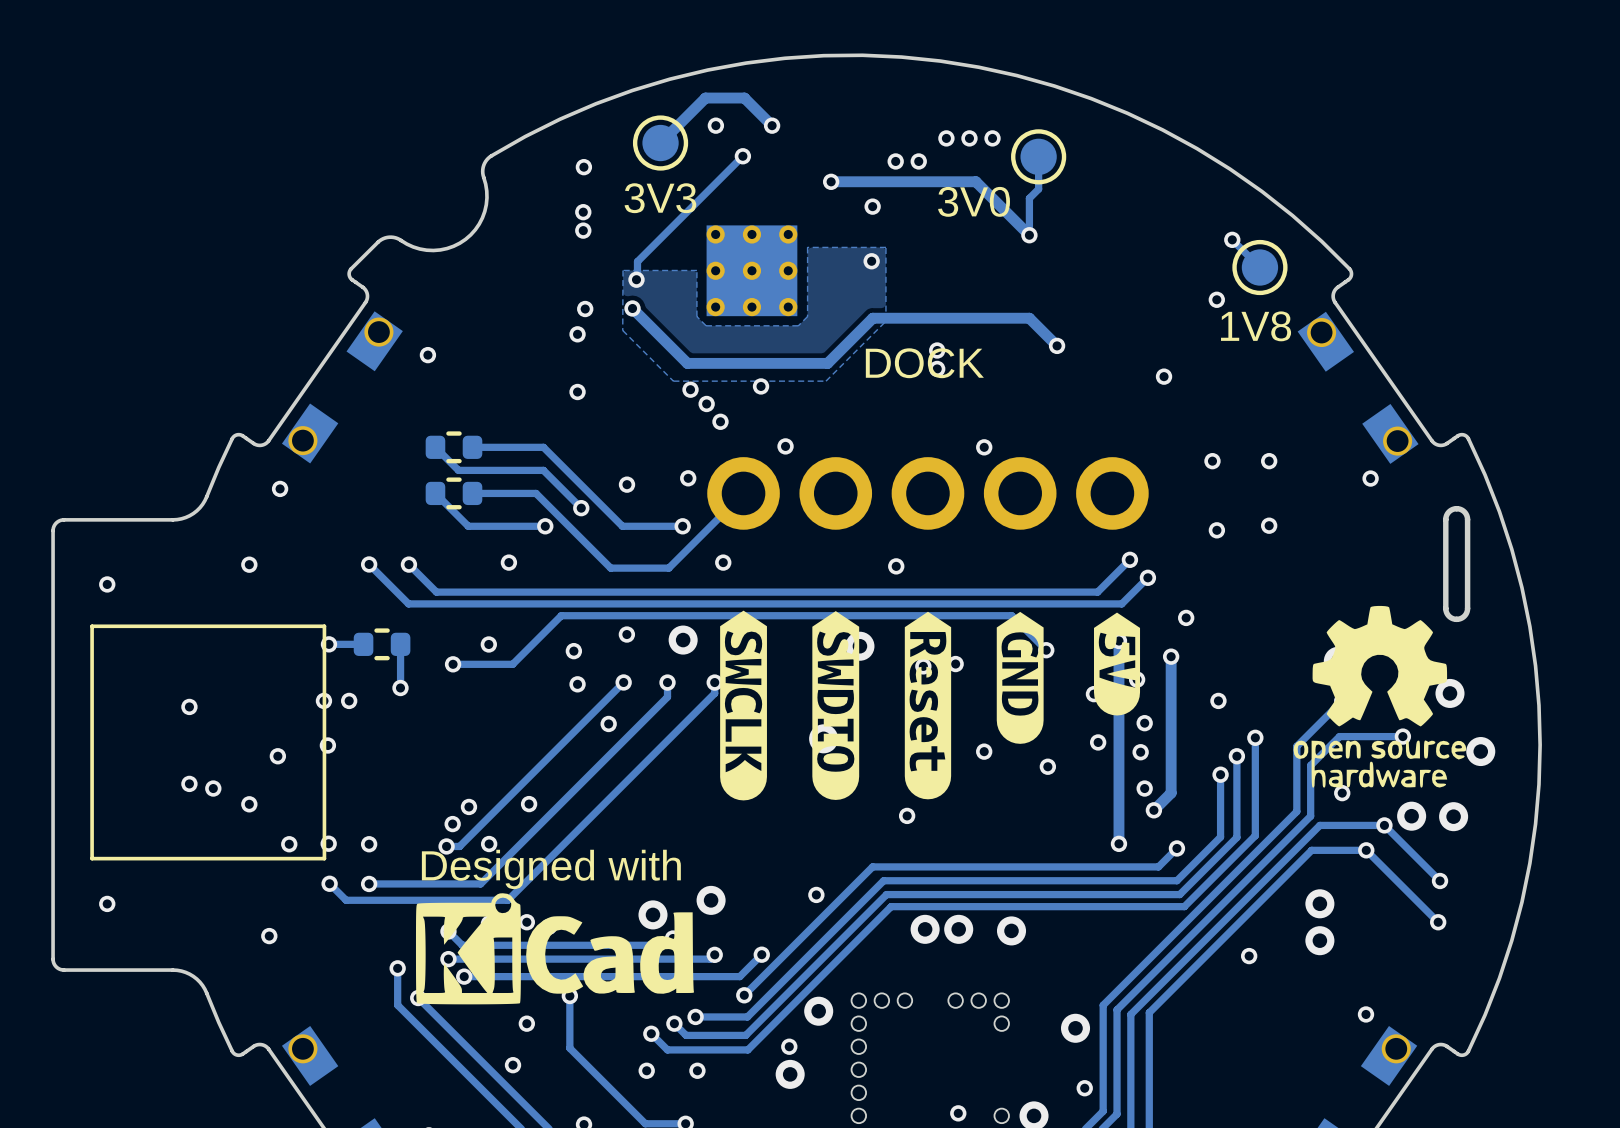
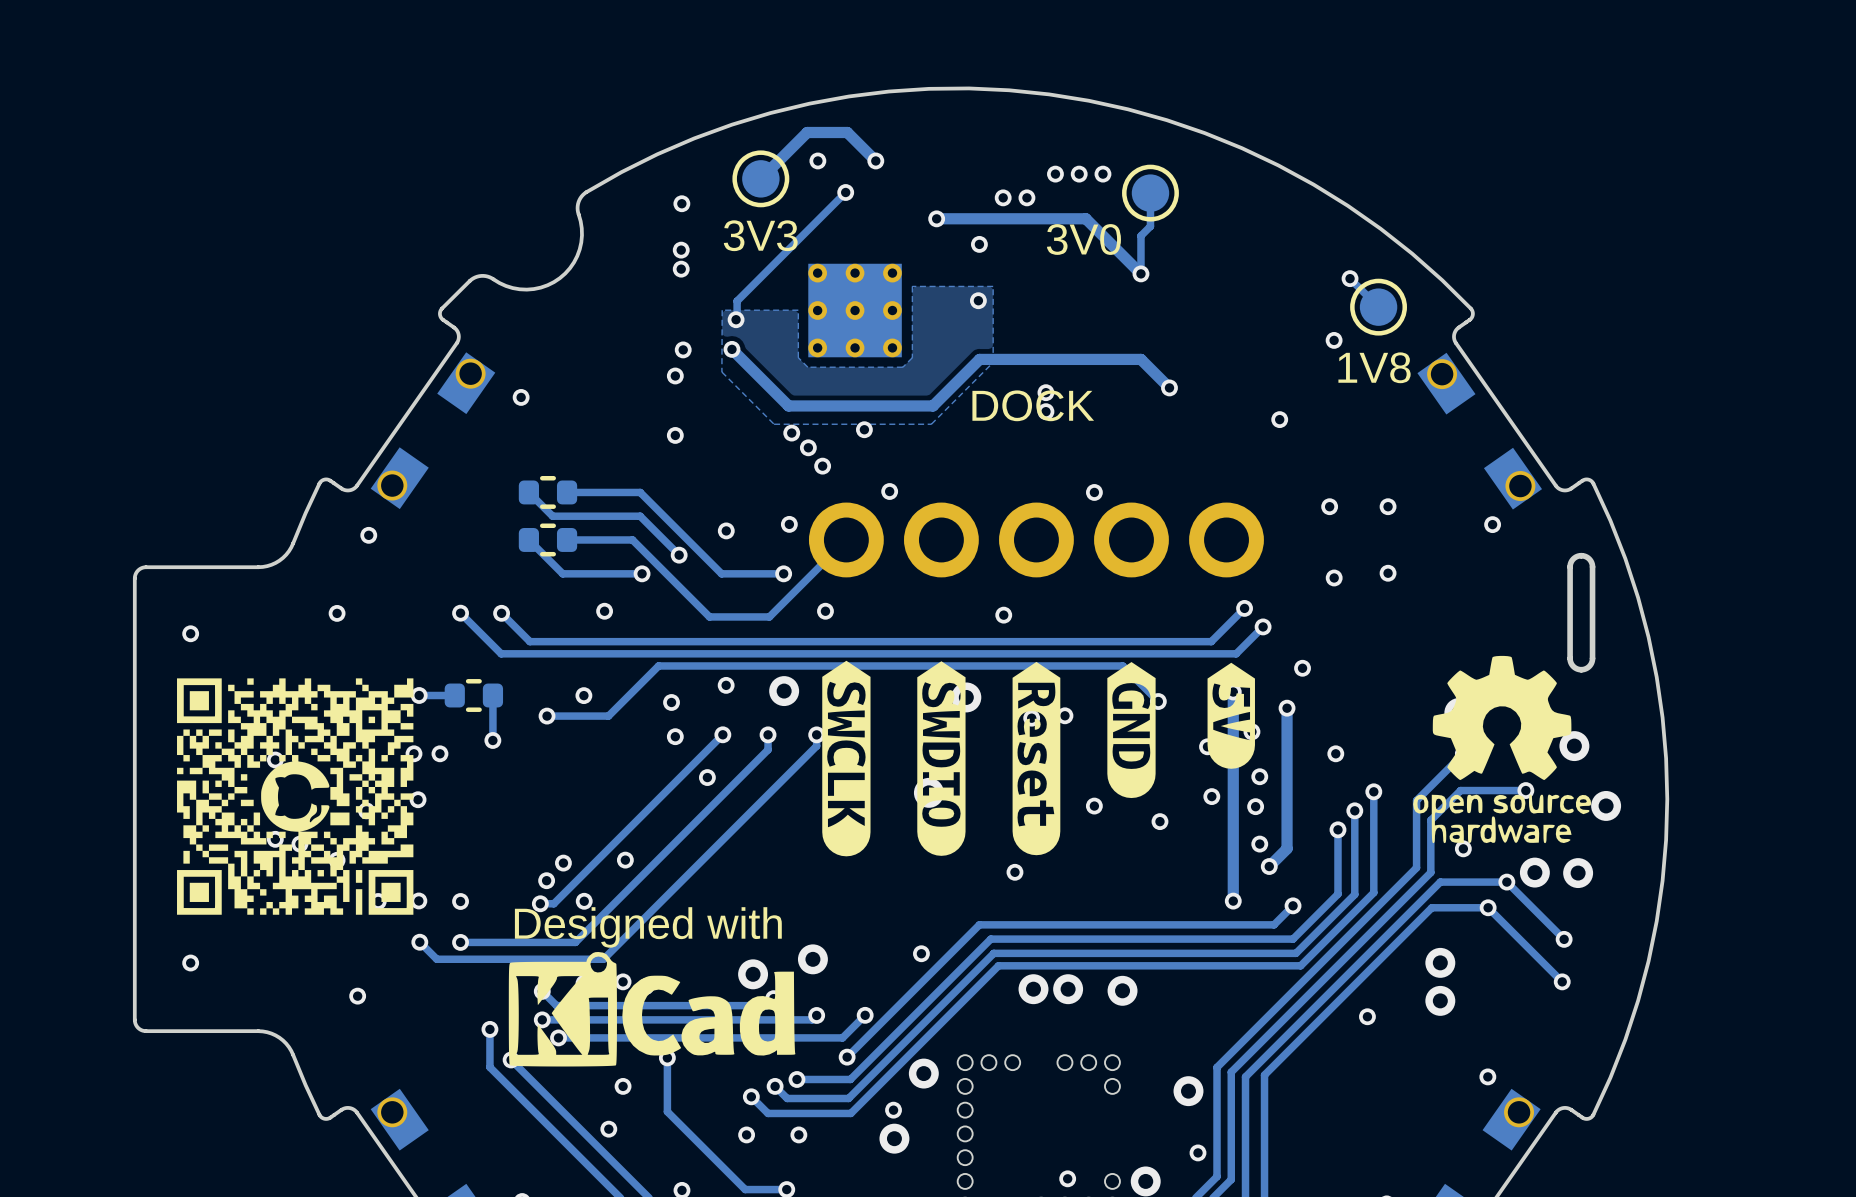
line: (324, 626) (324, 858) (92, 858) (92, 626) (324, 626) -> none
drawing: none -> [177, 678, 414, 915]

